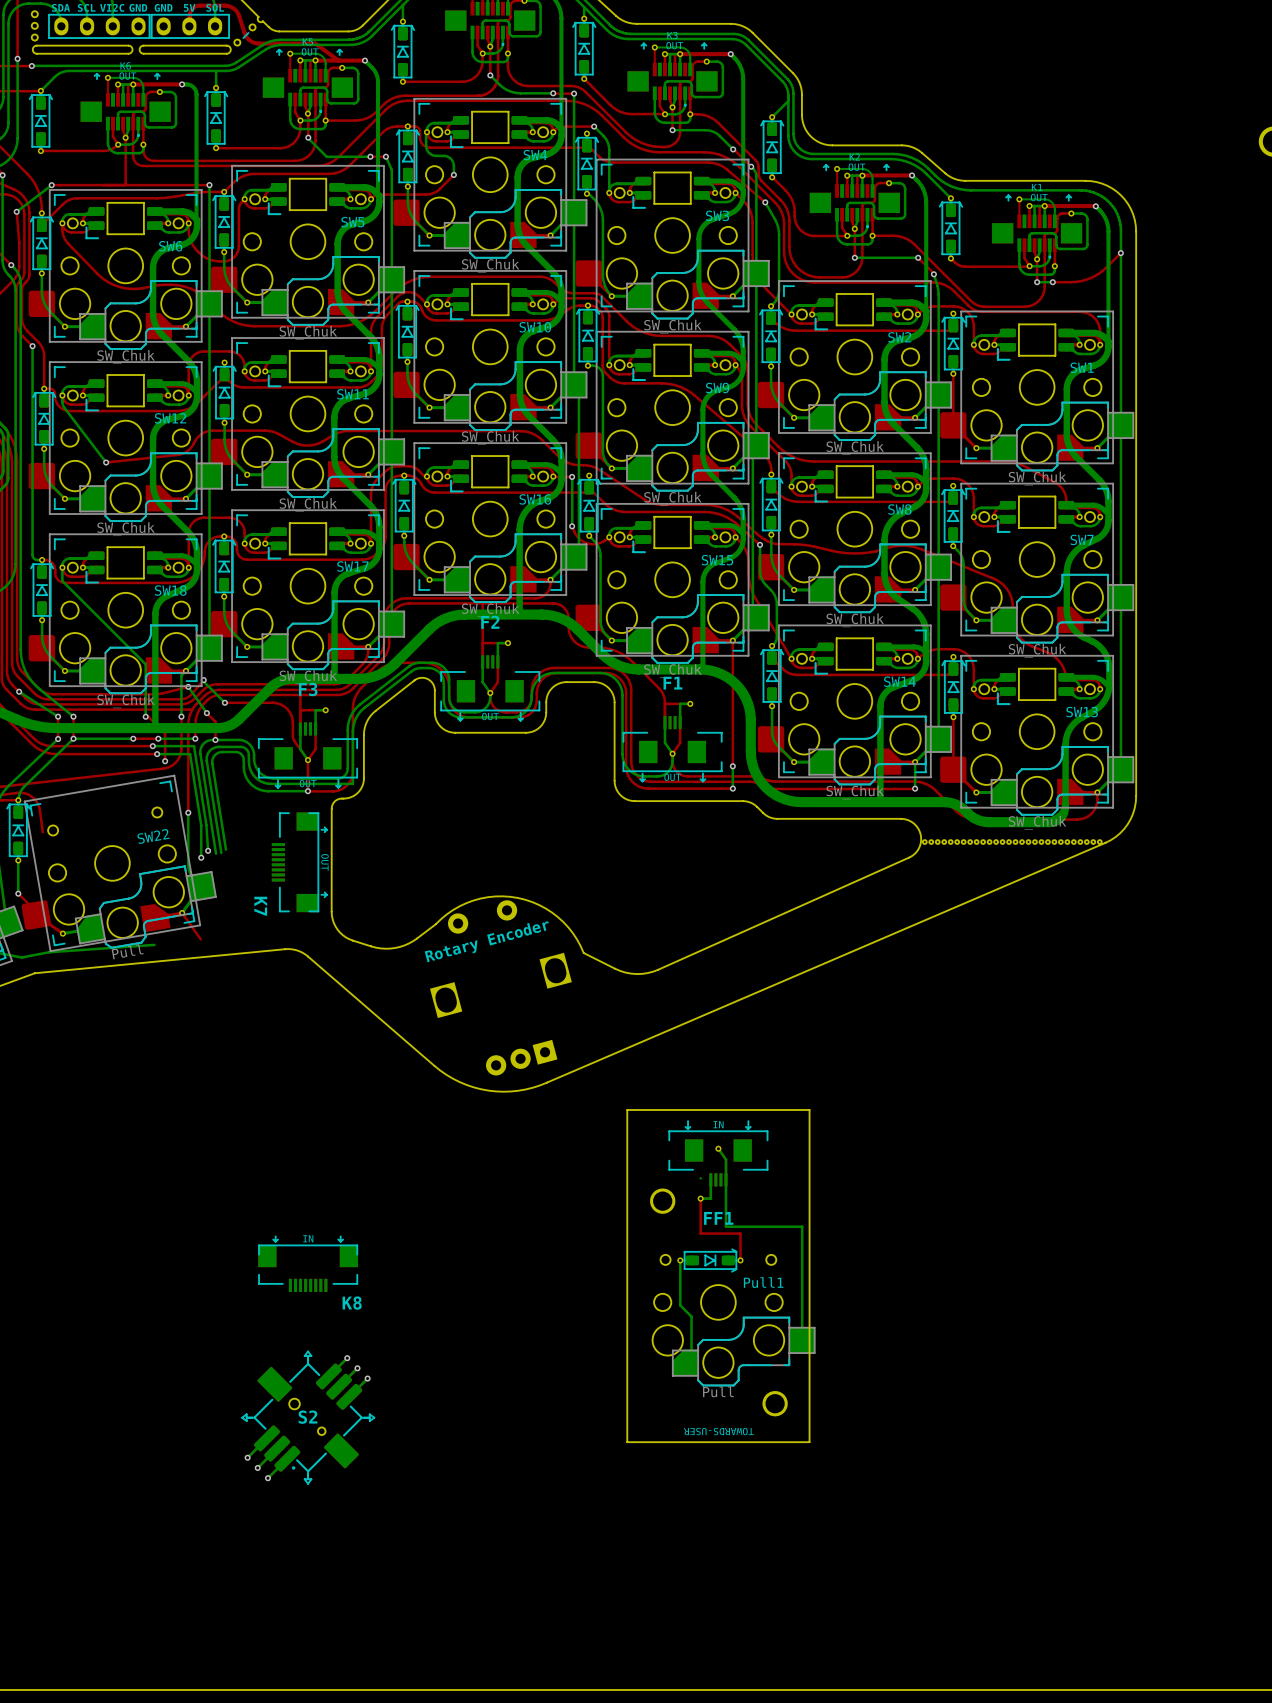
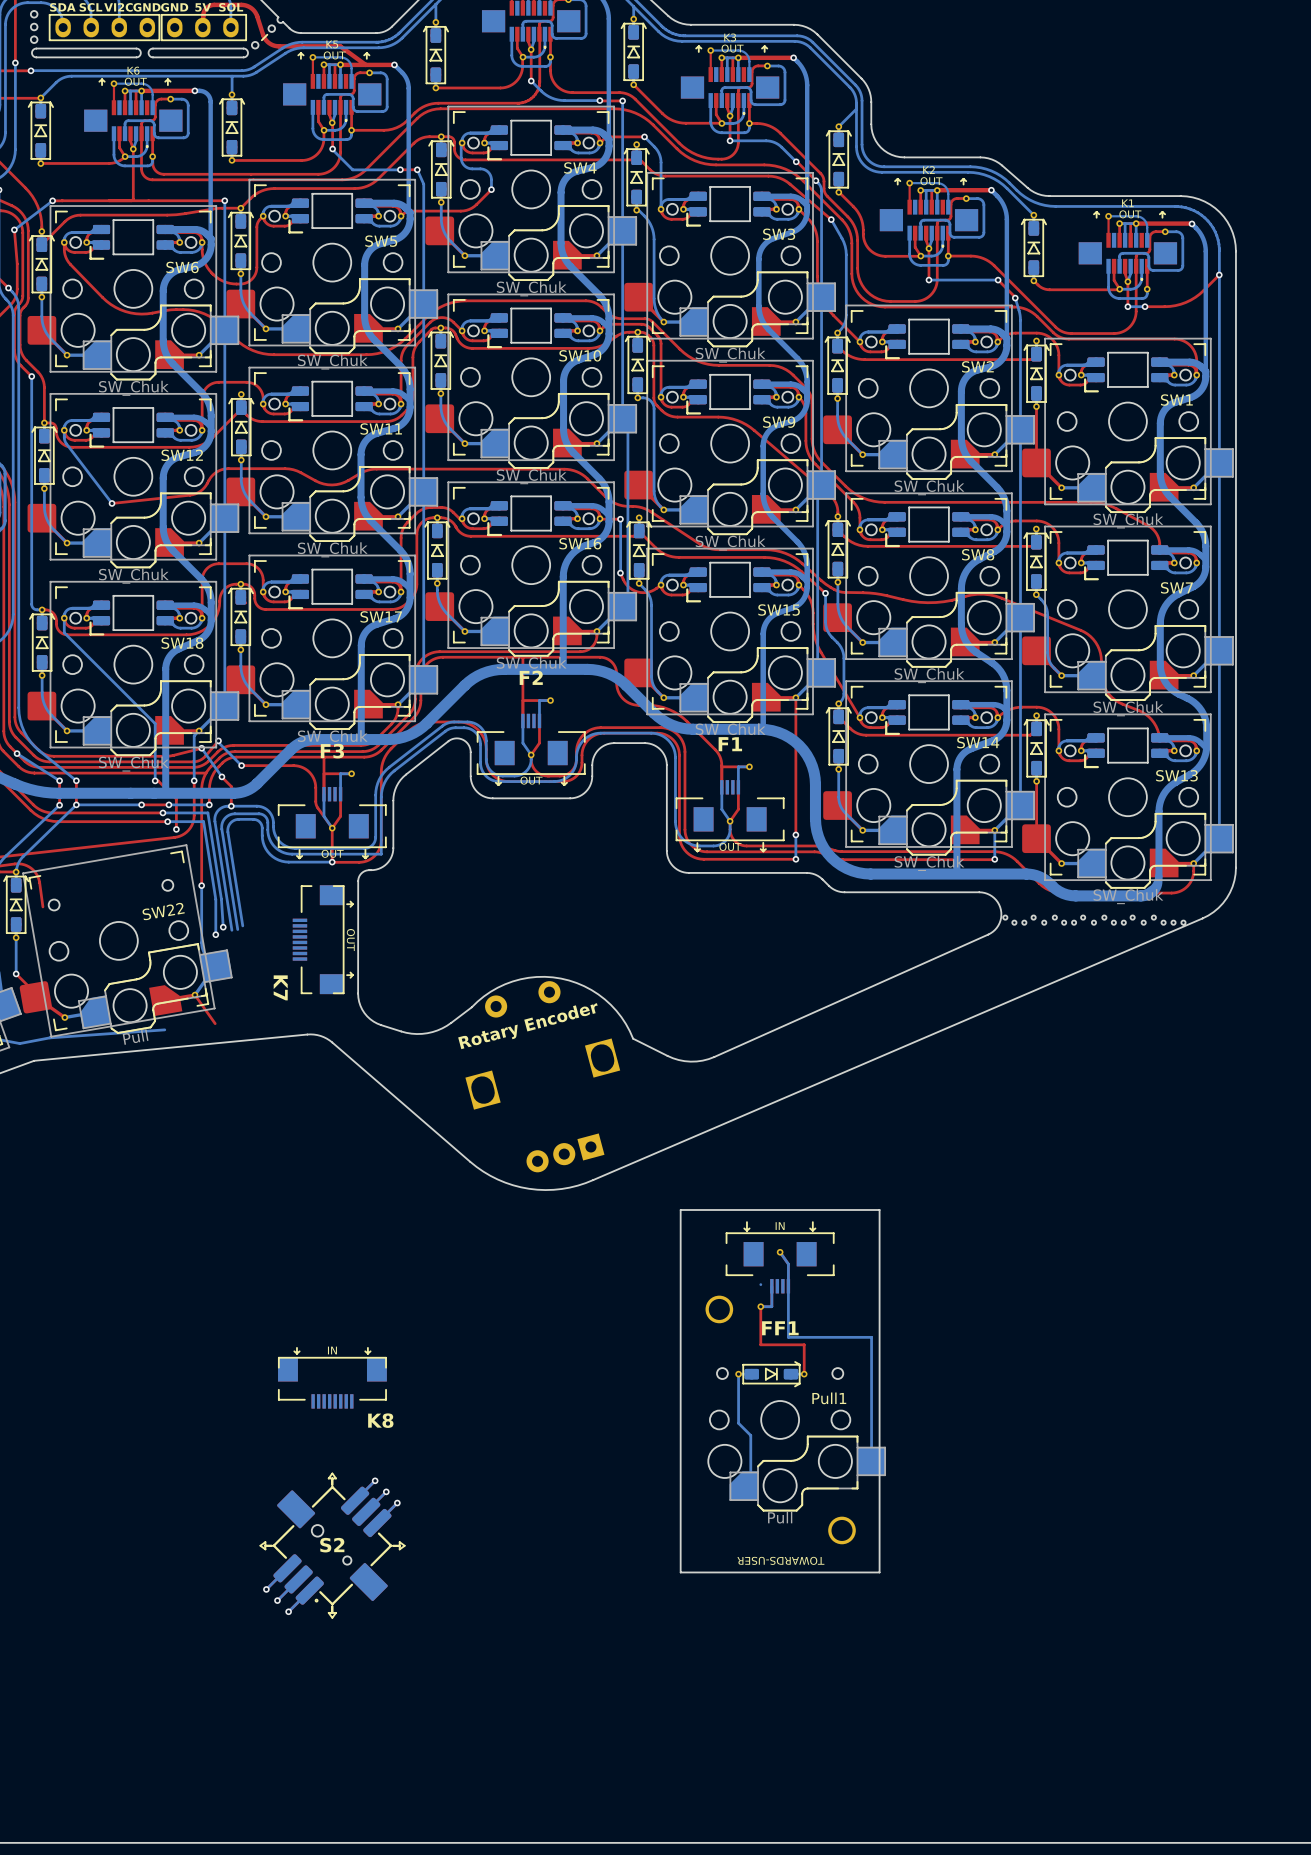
round board edge: [928, 839, 934, 845] -> none
round board edge: [935, 839, 941, 845] -> none
round board edge: [941, 839, 947, 845] -> none
round board edge: [954, 839, 960, 845] -> none
round board edge: [961, 839, 967, 845] -> none
round board edge: [973, 839, 980, 845] -> none
round board edge: [980, 839, 986, 845] -> none
round board edge: [986, 839, 993, 845] -> none
round board edge: [999, 839, 1006, 845] -> none
round board edge: [1006, 839, 1012, 845] -> none
round board edge: [1019, 839, 1025, 845] -> none
round board edge: [1025, 839, 1032, 845] -> none
round board edge: [1032, 839, 1038, 845] -> none
round board edge: [1045, 839, 1051, 845] -> none
round board edge: [1051, 839, 1058, 845] -> none
round board edge: [1064, 839, 1071, 845] -> none
round board edge: [1071, 839, 1077, 845] -> none
round board edge: [1077, 839, 1084, 845] -> none
round board edge: [1084, 839, 1090, 845] -> none
round board edge: [1090, 839, 1097, 845] -> none
round board edge: [1097, 839, 1103, 845] -> none
round board edge: none -> [1011, 919, 1018, 926]
round board edge: none -> [1021, 919, 1028, 926]
round board edge: none -> [1041, 919, 1048, 926]
round board edge: none -> [1061, 919, 1068, 926]
round board edge: none -> [1071, 919, 1078, 926]
round board edge: none -> [1091, 919, 1097, 926]
round board edge: none -> [1110, 919, 1117, 926]
round board edge: none -> [1120, 919, 1127, 926]
round board edge: none -> [1140, 919, 1147, 926]
round board edge: none -> [1160, 919, 1167, 926]
round board edge: none -> [1170, 919, 1177, 926]
round board edge: none -> [1180, 919, 1187, 926]

